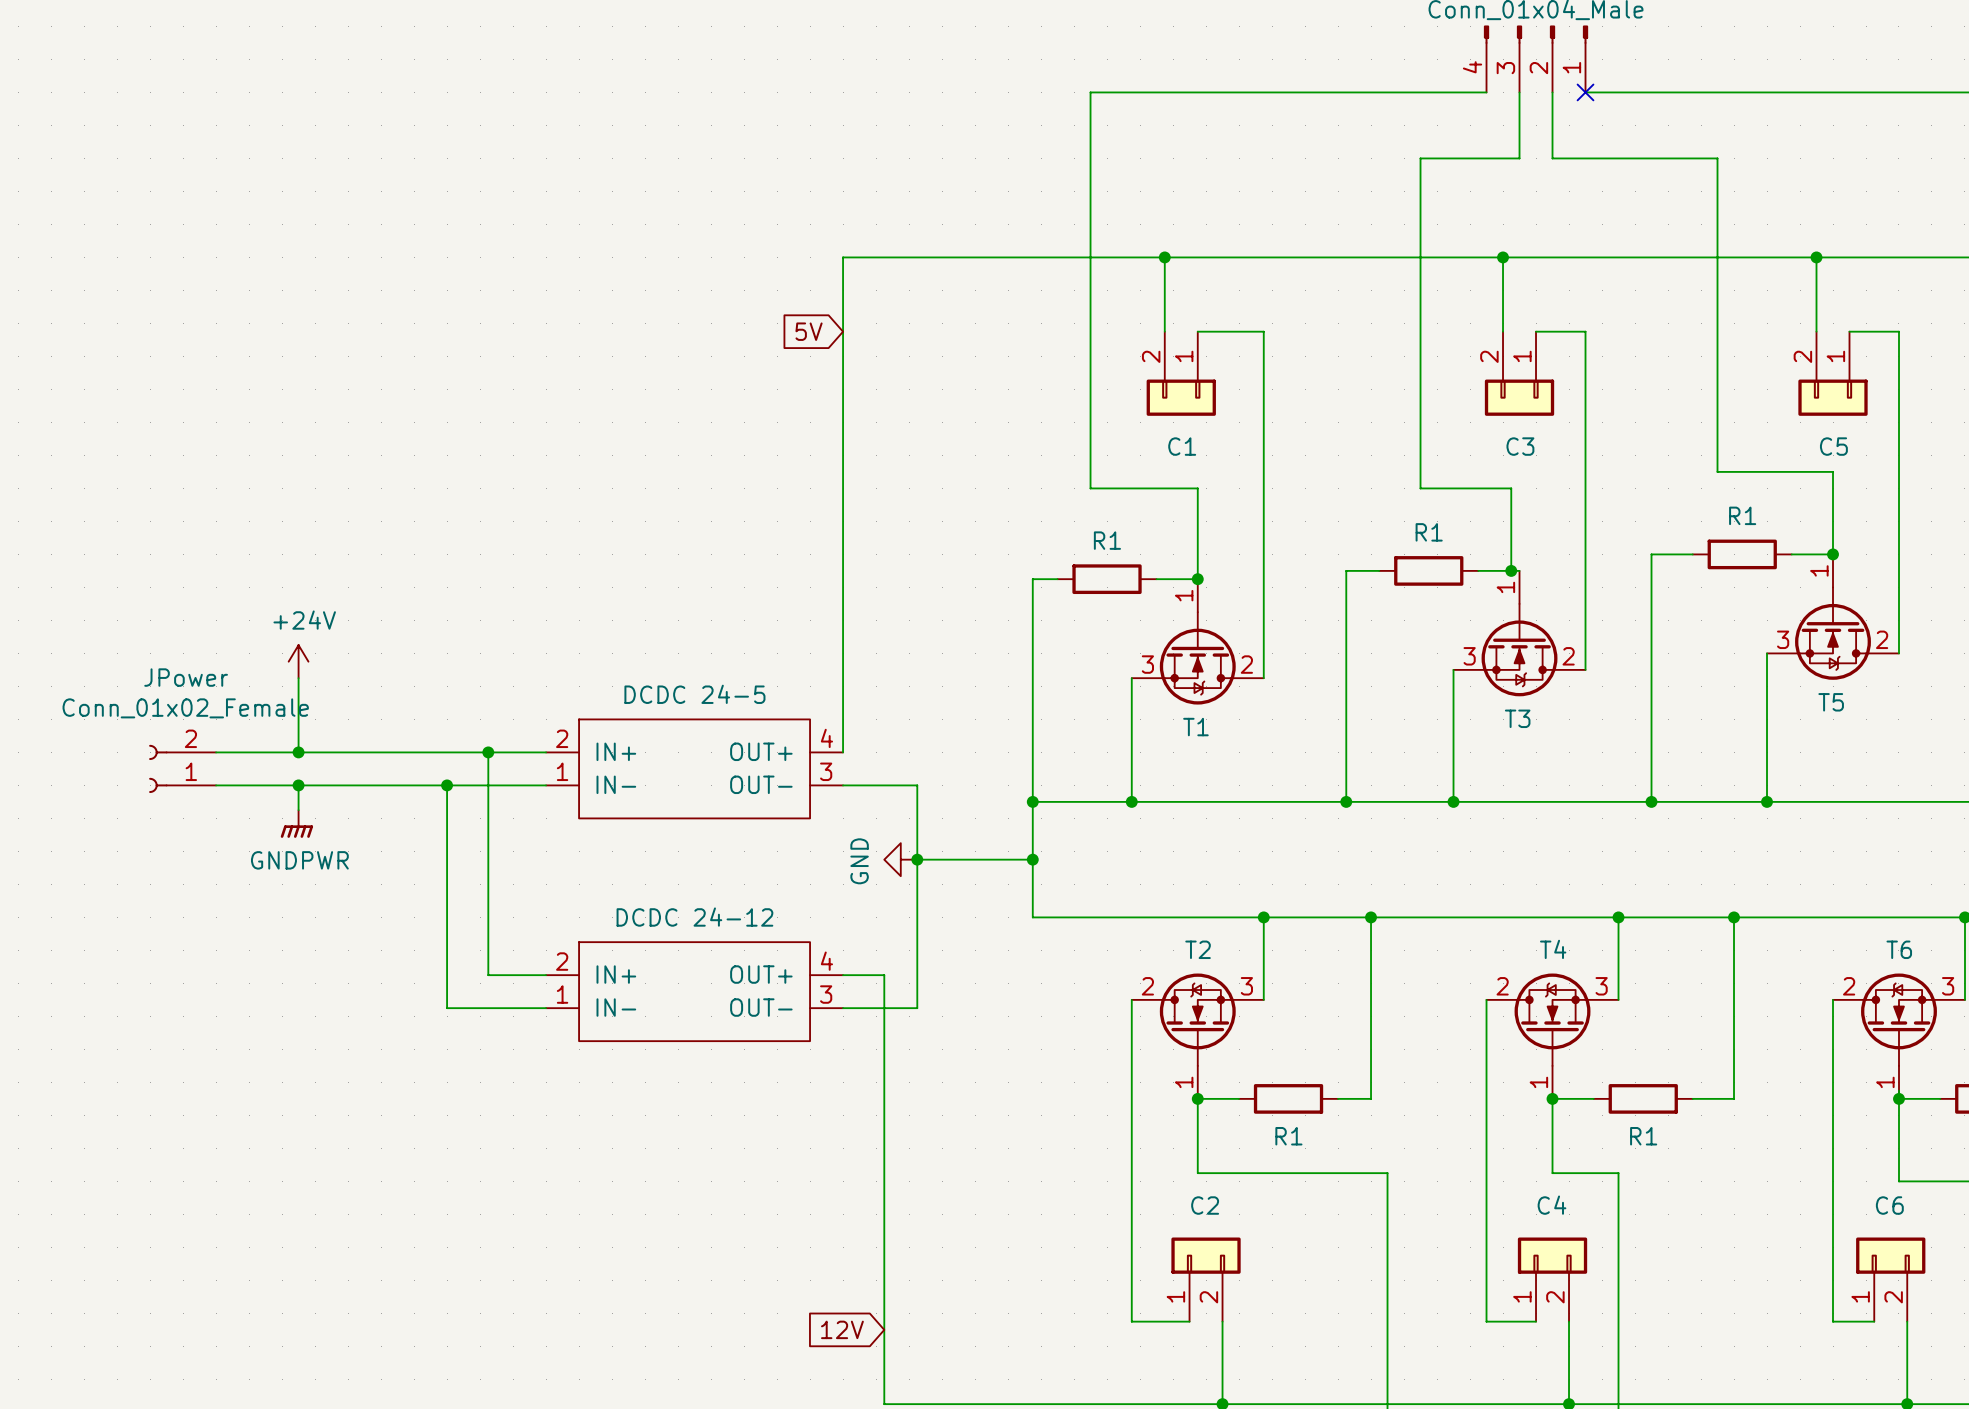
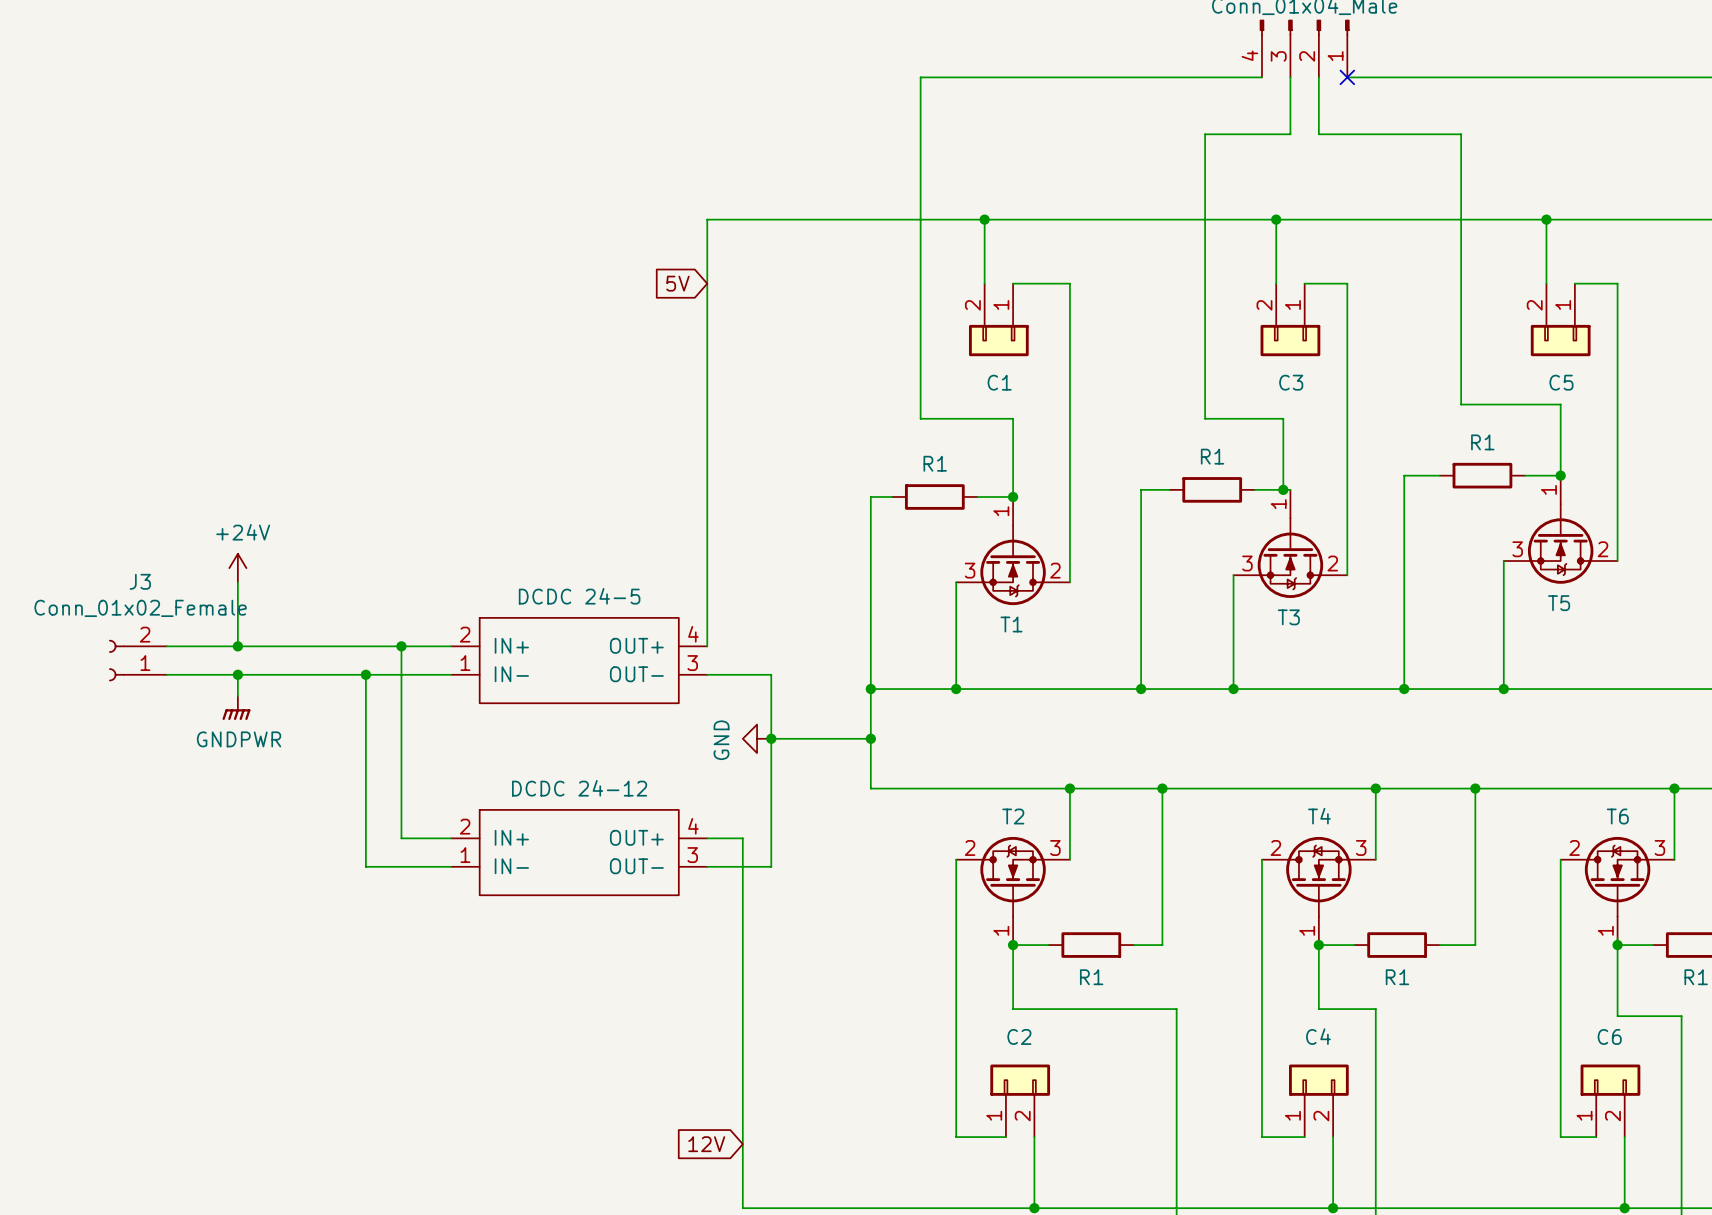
JPower name: JPower (186, 677) -> J3 (140, 581)

